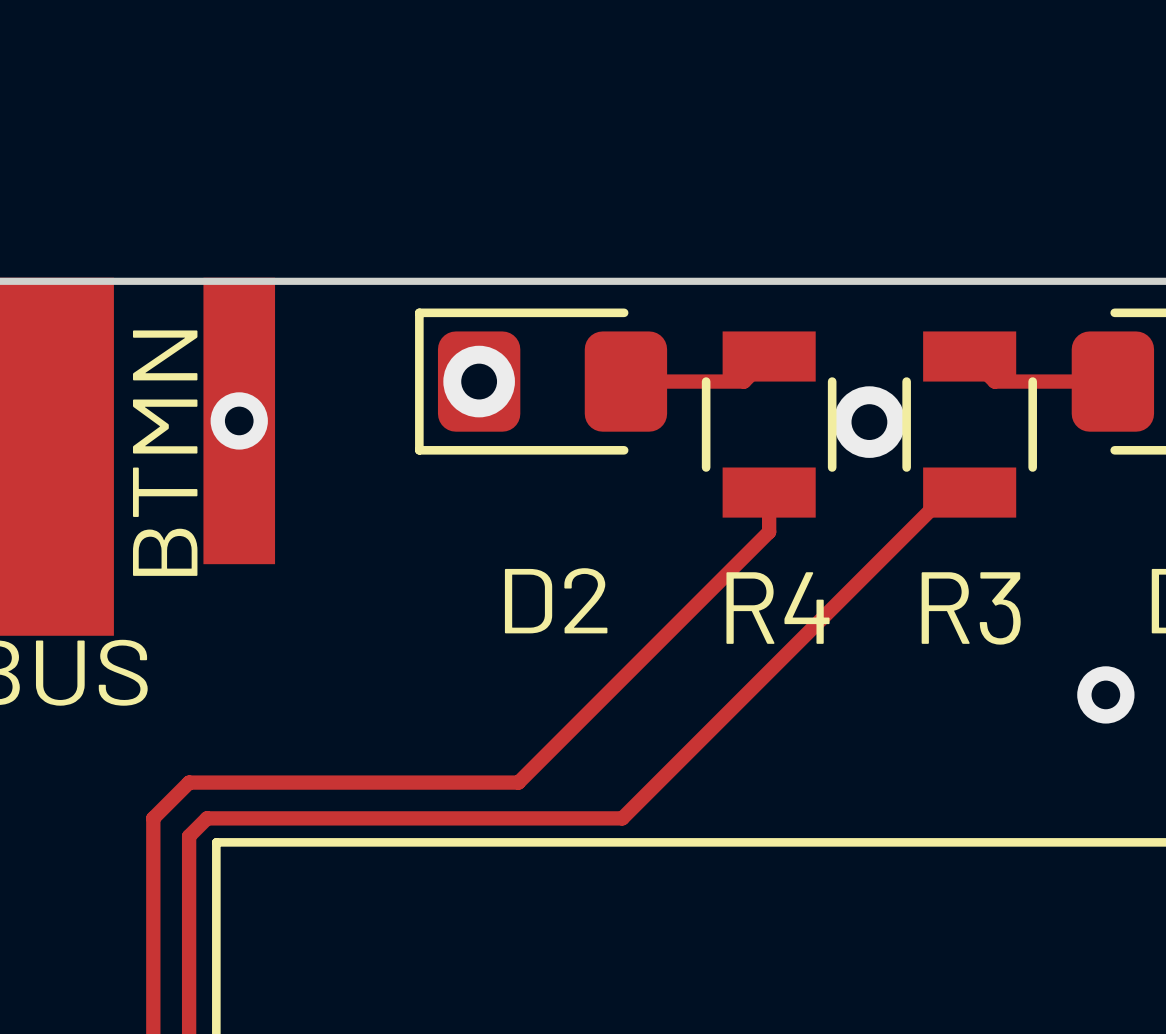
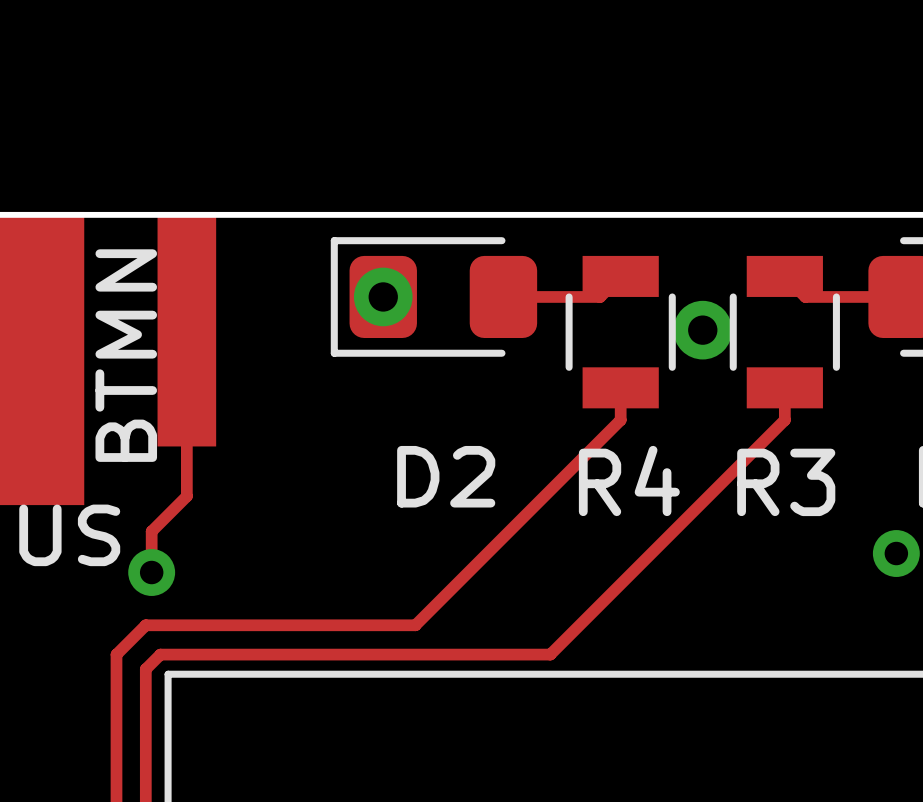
track: none -> (186, 329) (186, 496) (151, 531) (151, 572)
via position: (239, 420) -> (151, 572)
track: (948, 492) (622, 818) -> (784, 387) (784, 420) (550, 654) (500, 654)

